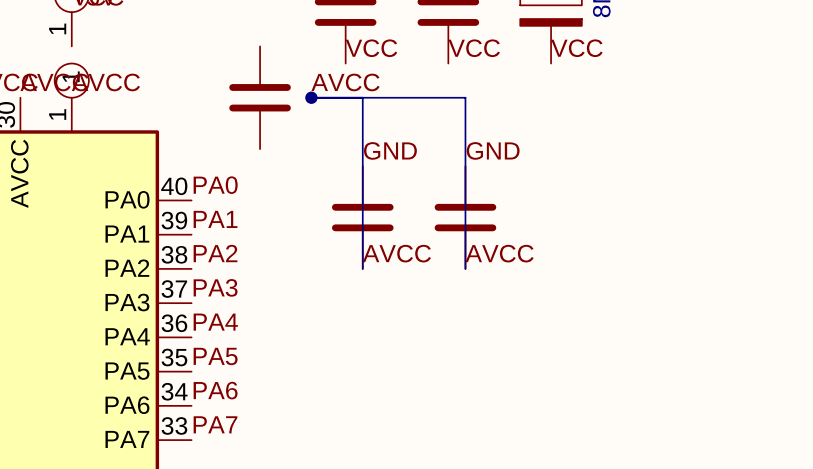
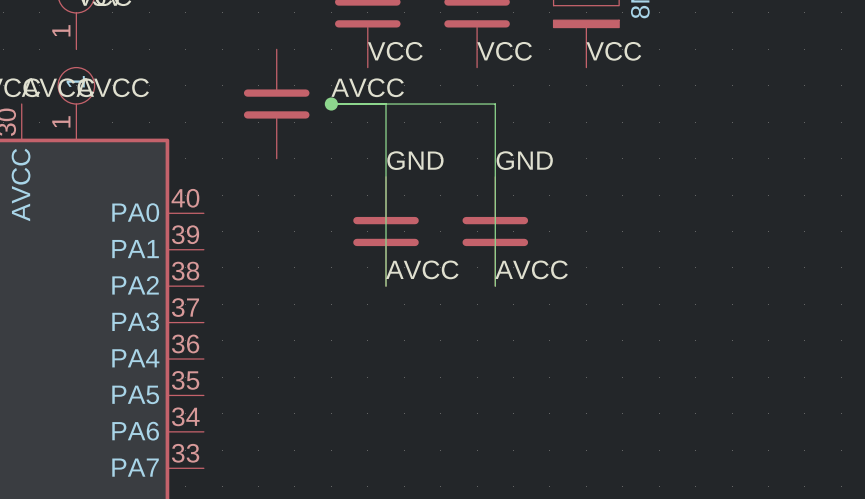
label: PA0 (215, 185) -> none
label: PA1 (215, 219) -> none
label: PA2 (215, 253) -> none
label: PA3 (215, 287) -> none
label: PA4 (215, 322) -> none
label: PA5 (215, 356) -> none
label: PA6 (215, 390) -> none
label: PA7 (215, 424) -> none

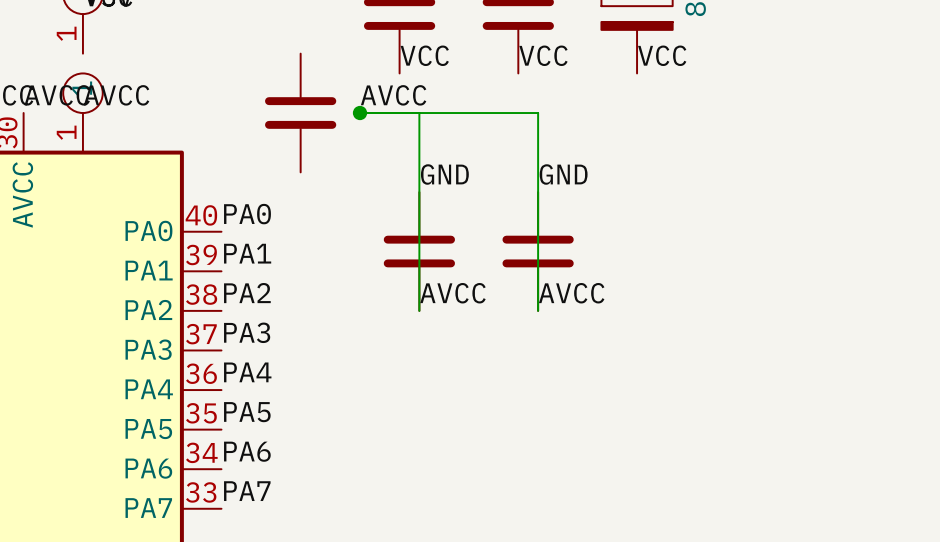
label: none -> PA0 (247, 214)
label: none -> PA1 (247, 253)
label: none -> PA2 (247, 293)
label: none -> PA3 (247, 332)
label: none -> PA4 (247, 372)
label: none -> PA5 (247, 412)
label: none -> PA6 (247, 451)
label: none -> PA7 (247, 491)

